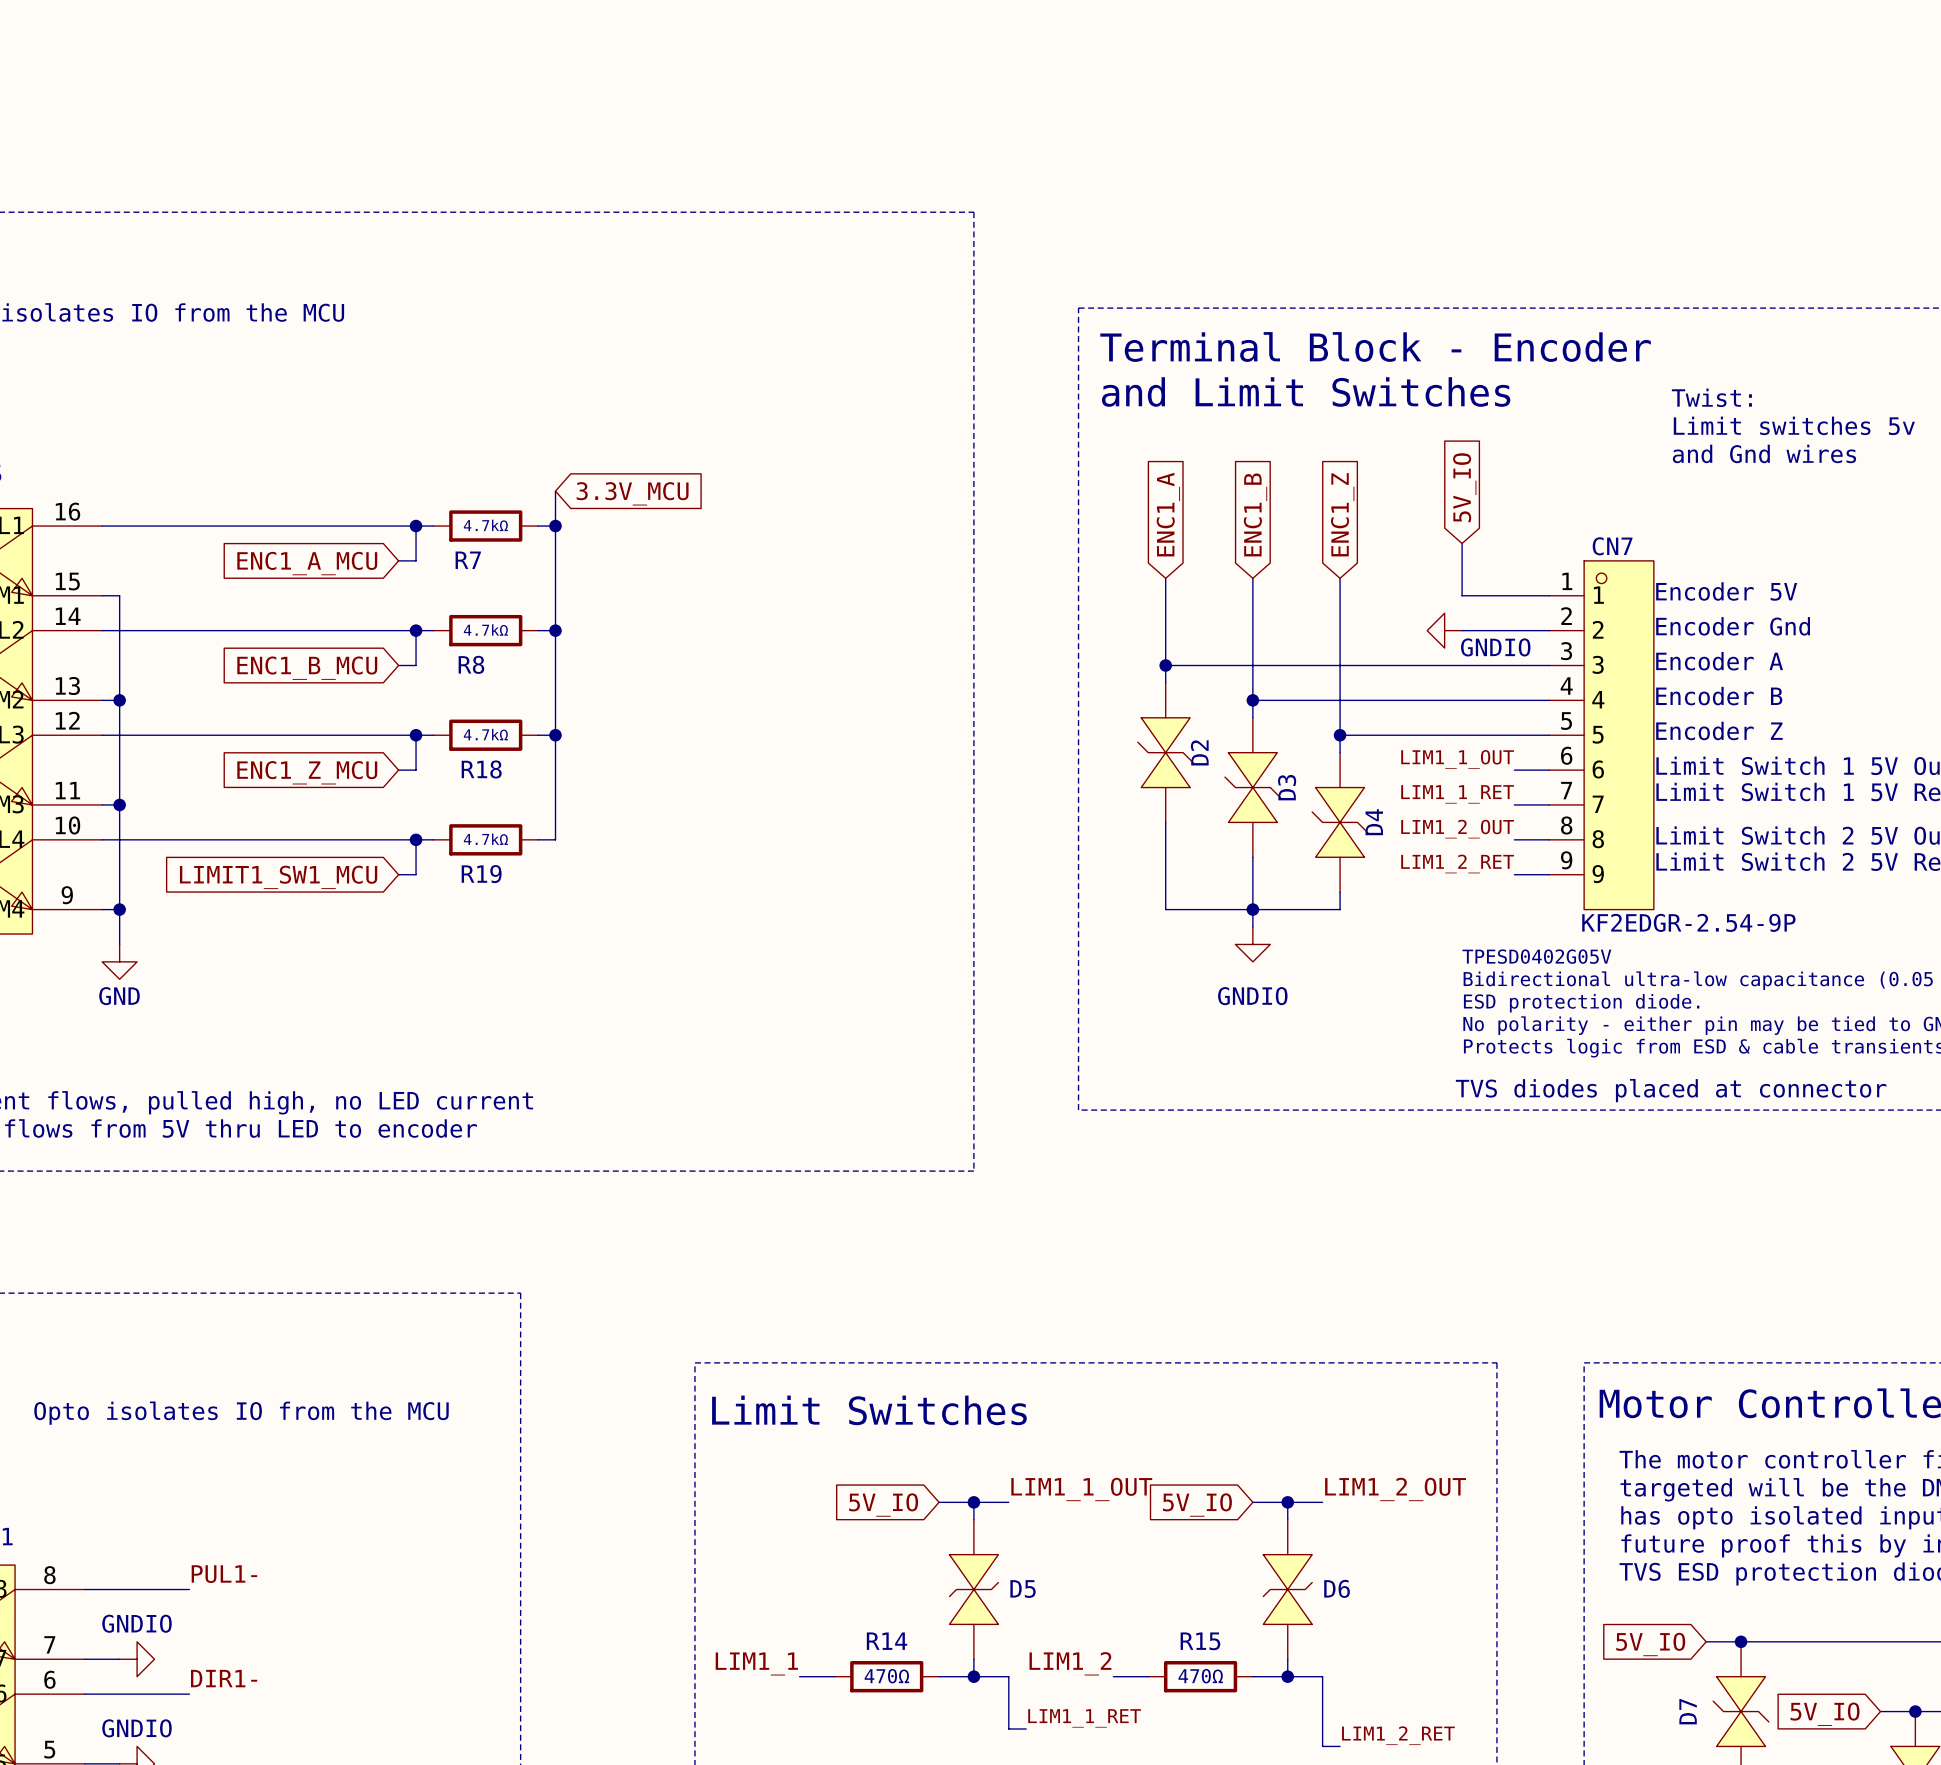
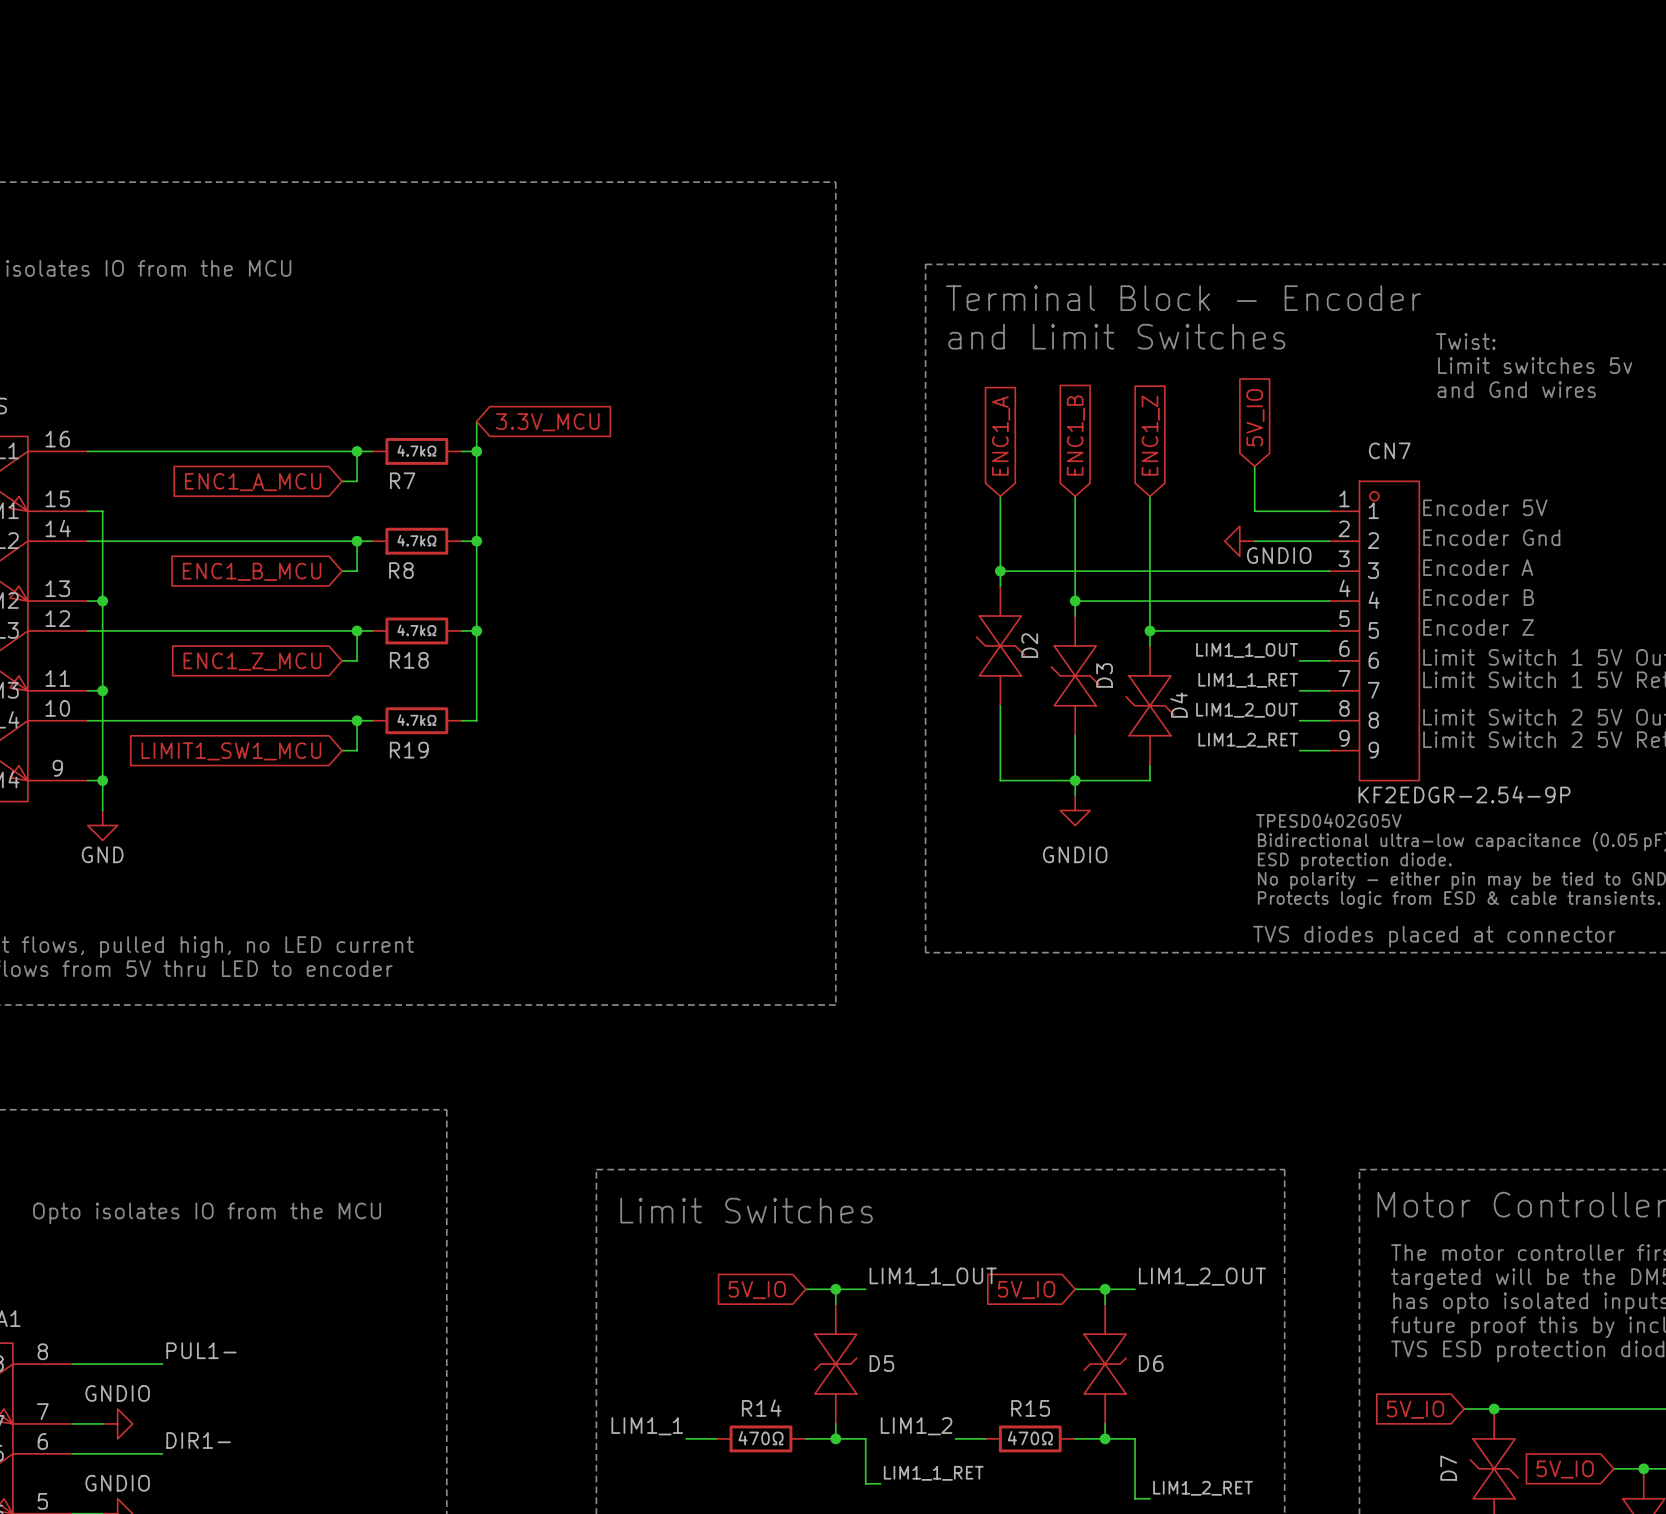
CN7 name position: CN7 (1612, 546) -> CN7 (1389, 450)
CN7 value position: KF2EDGR-2.54-9P (1688, 922) -> KF2EDGR-2.54-9P (1464, 794)

